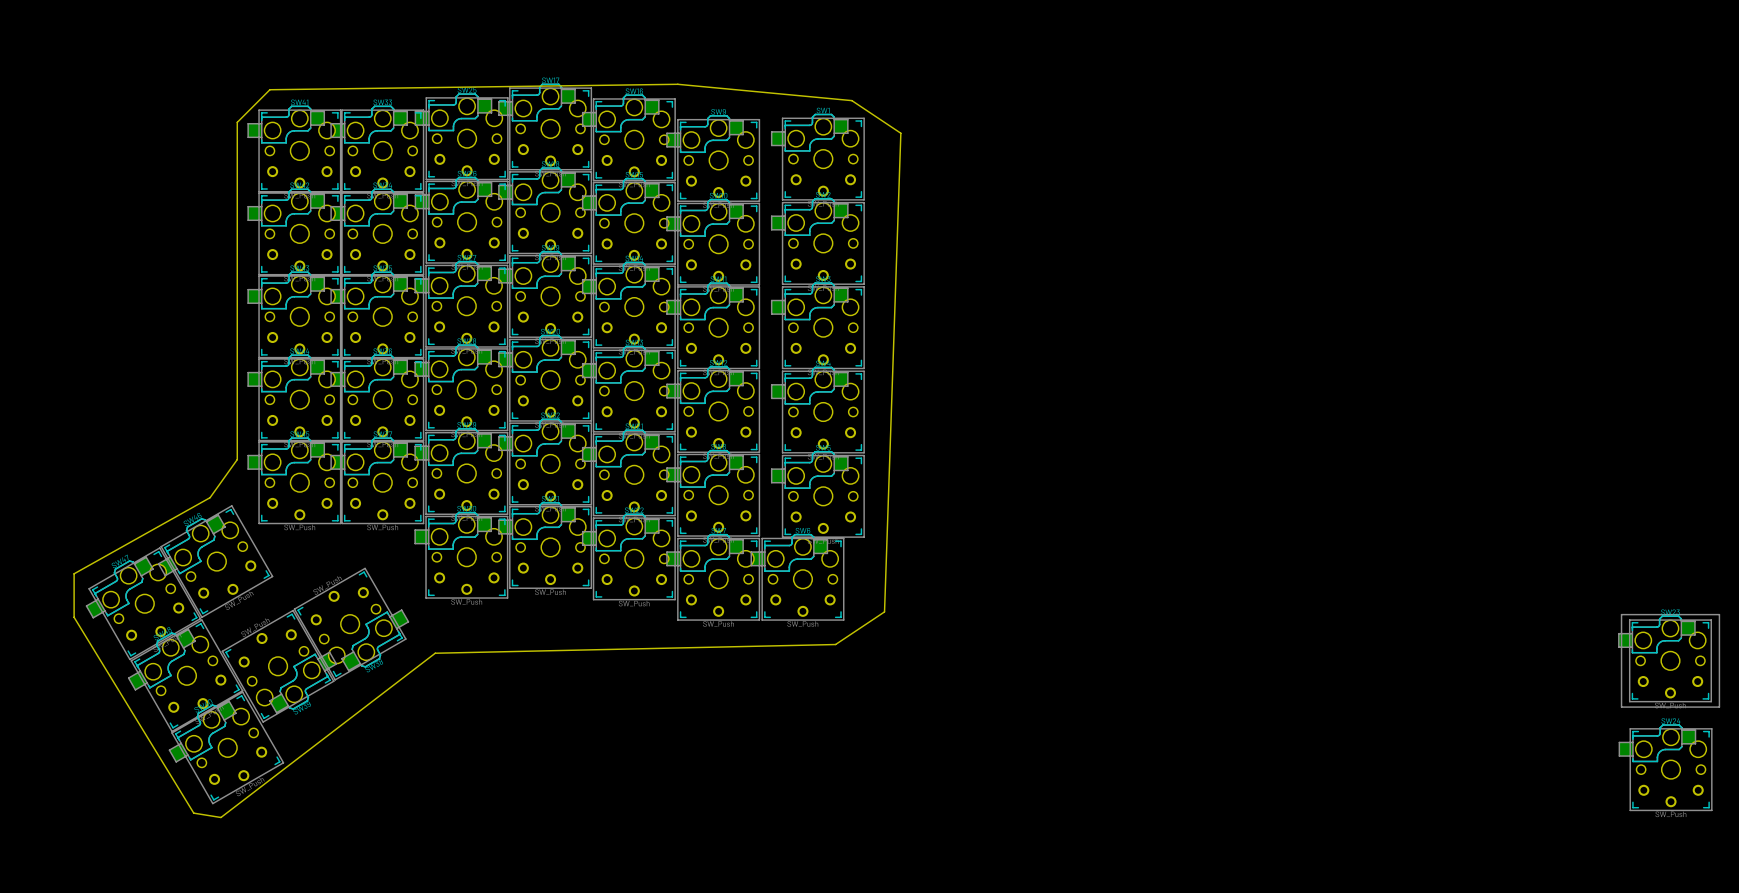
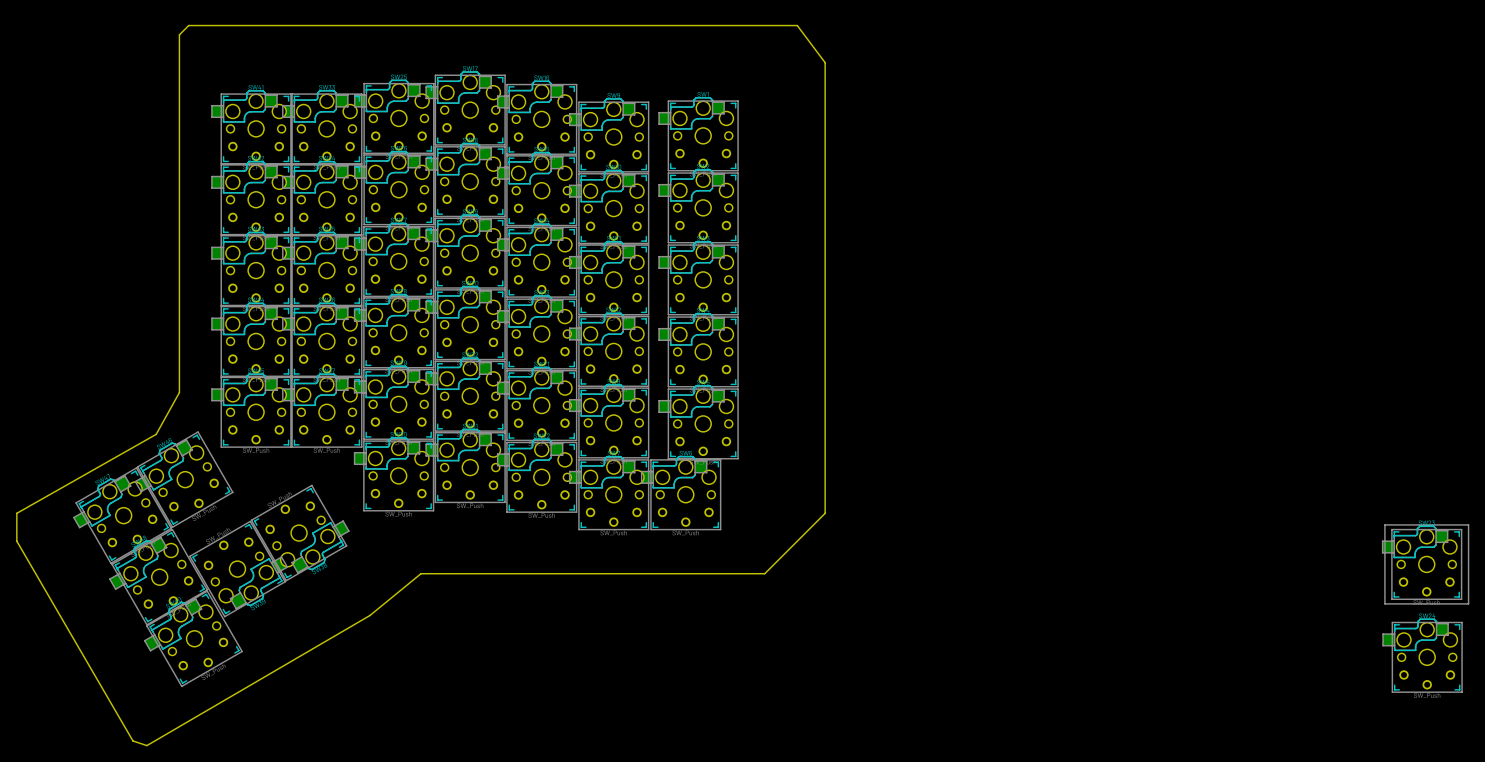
board edge: (677, 84) (851, 100) (900, 133) (884, 611) (835, 644) (435, 653) (220, 817) (193, 813) (74, 617) (74, 573) (210, 497) (237, 459) (237, 122) (269, 89) (677, 84) -> (797, 25) (825, 62) (825, 513) (764, 573) (420, 573) (369, 615) (146, 745) (132, 740) (16, 541) (16, 513) (156, 434) (179, 392) (179, 34) (188, 25) (797, 25)

